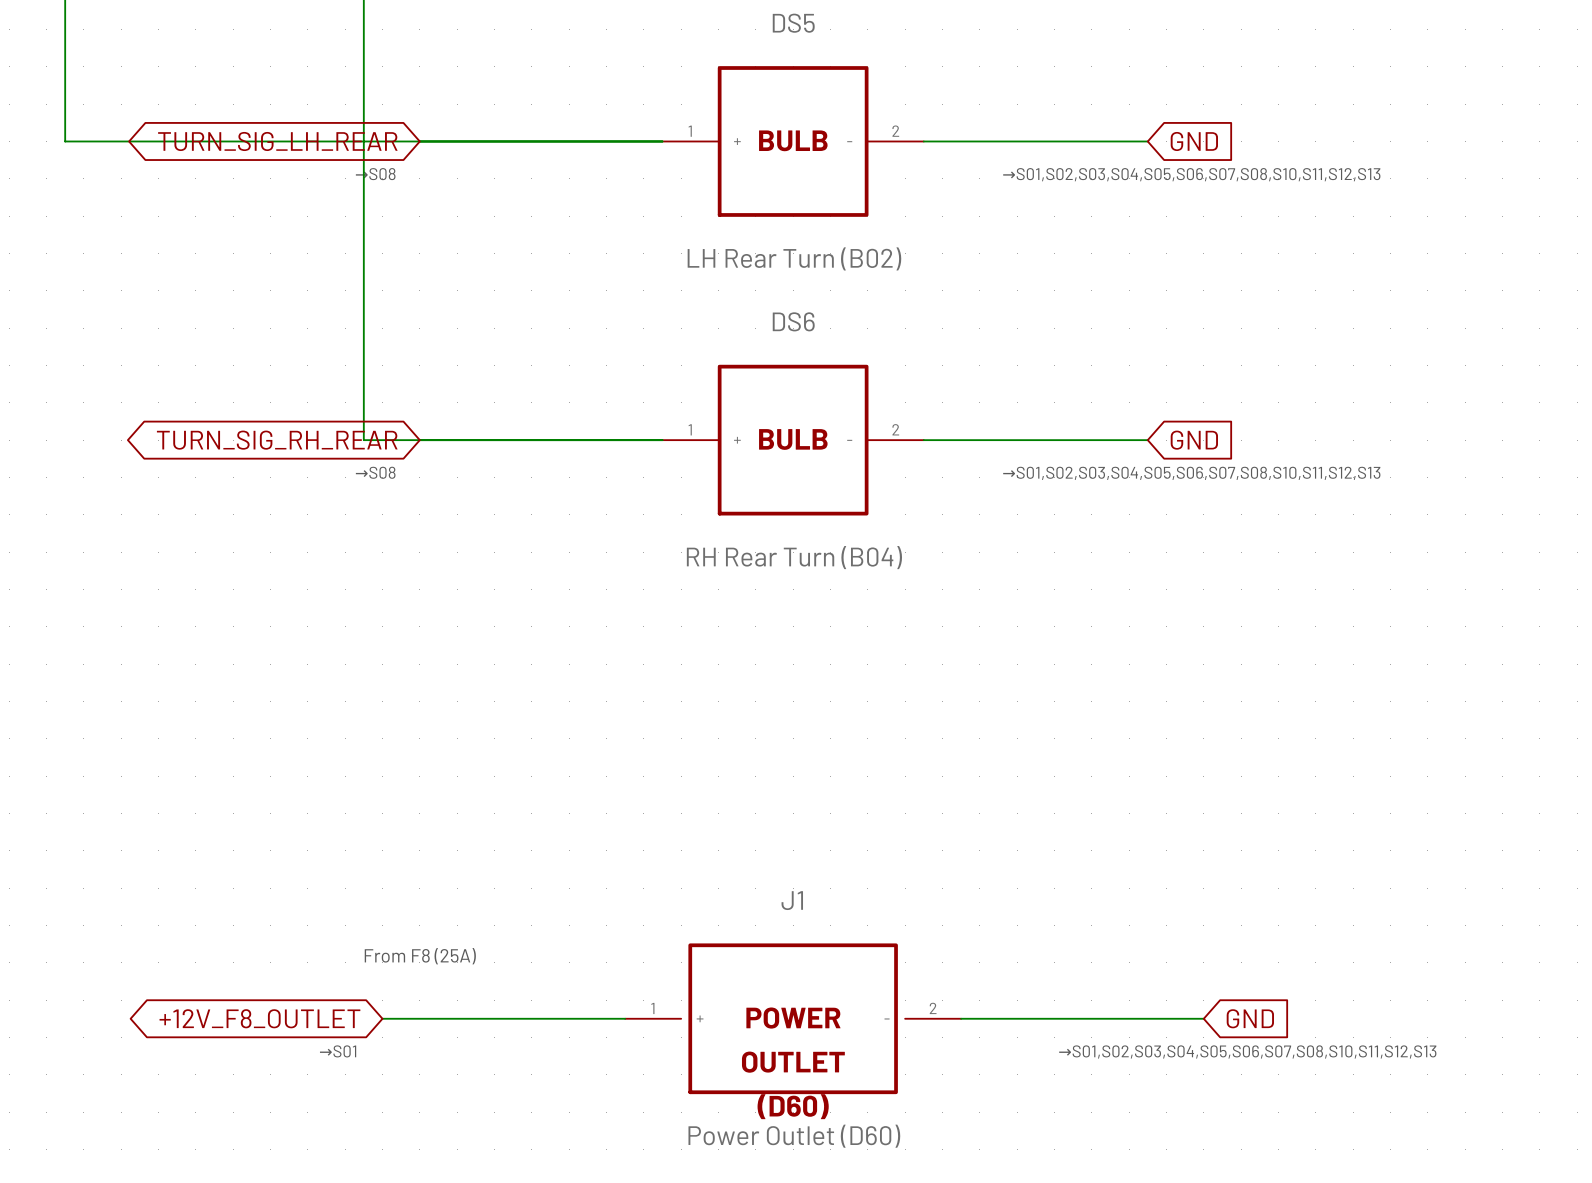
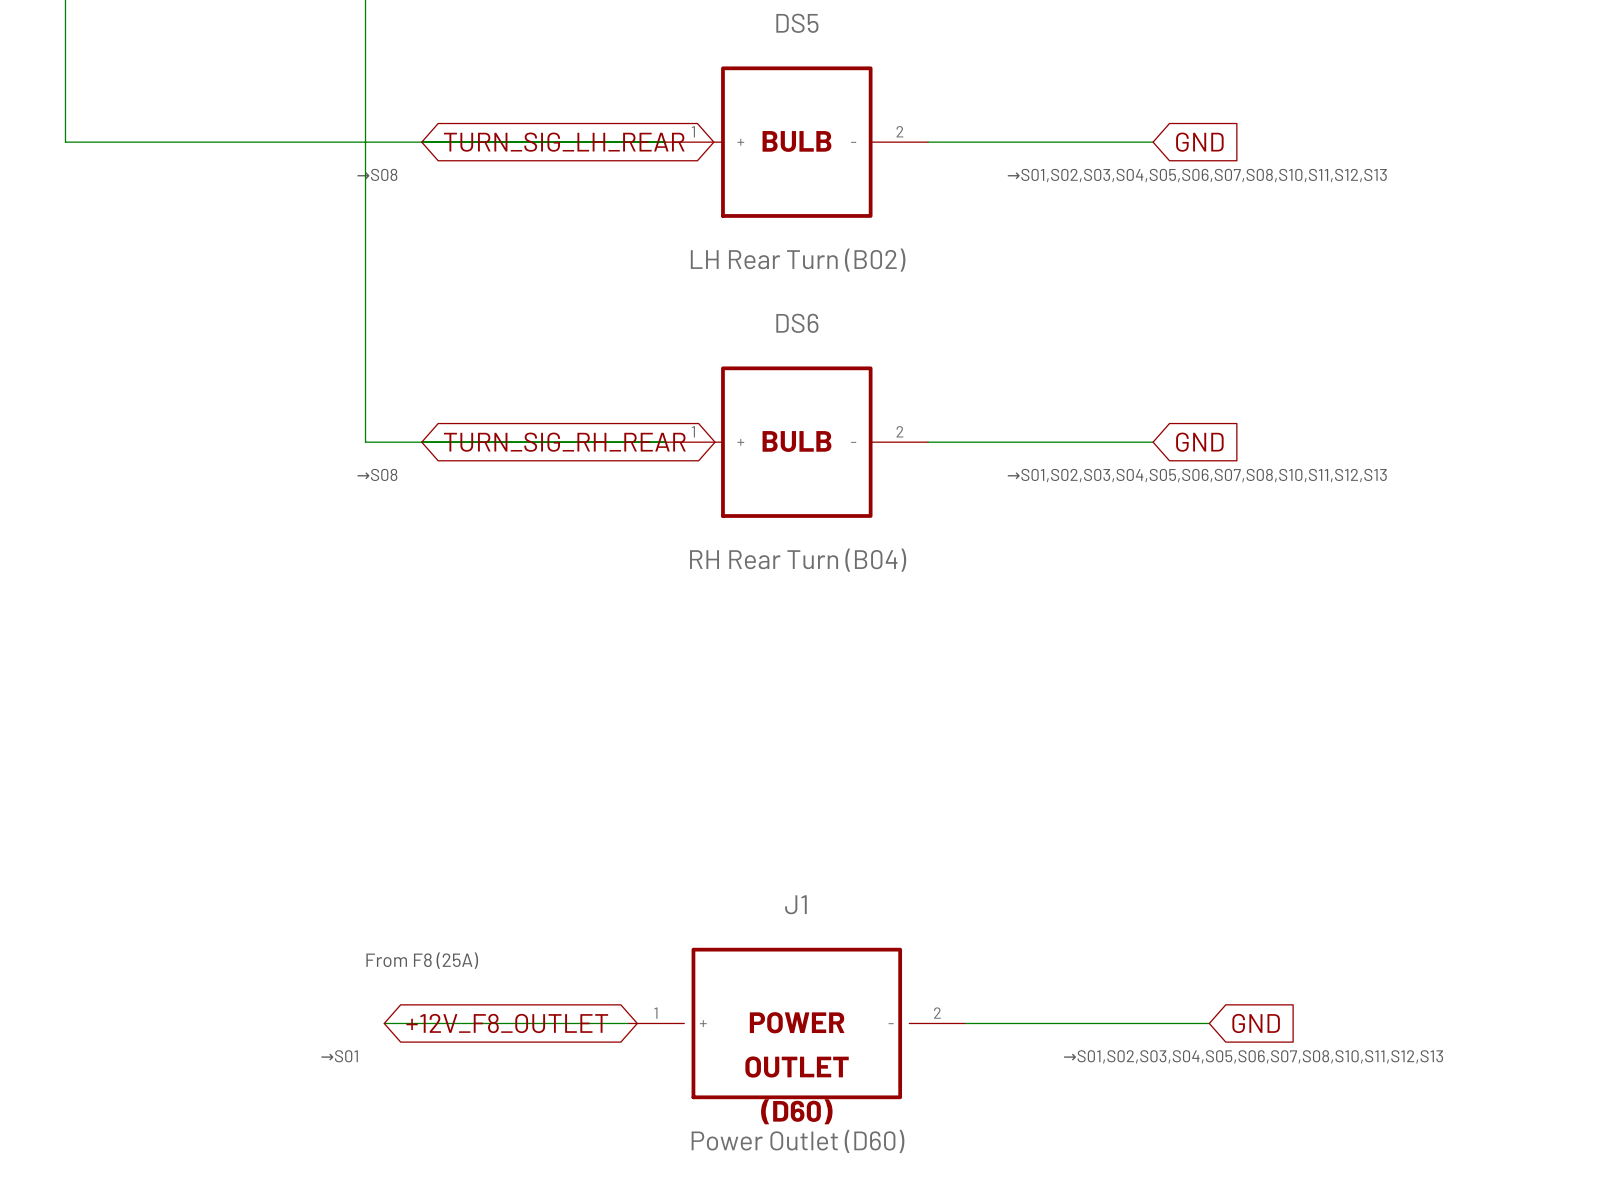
global label rotation: 0° (277, 141) -> 180° (564, 142)
global label rotation: 0° (277, 440) -> 180° (564, 442)
global label rotation: 0° (259, 1018) -> 180° (507, 1023)

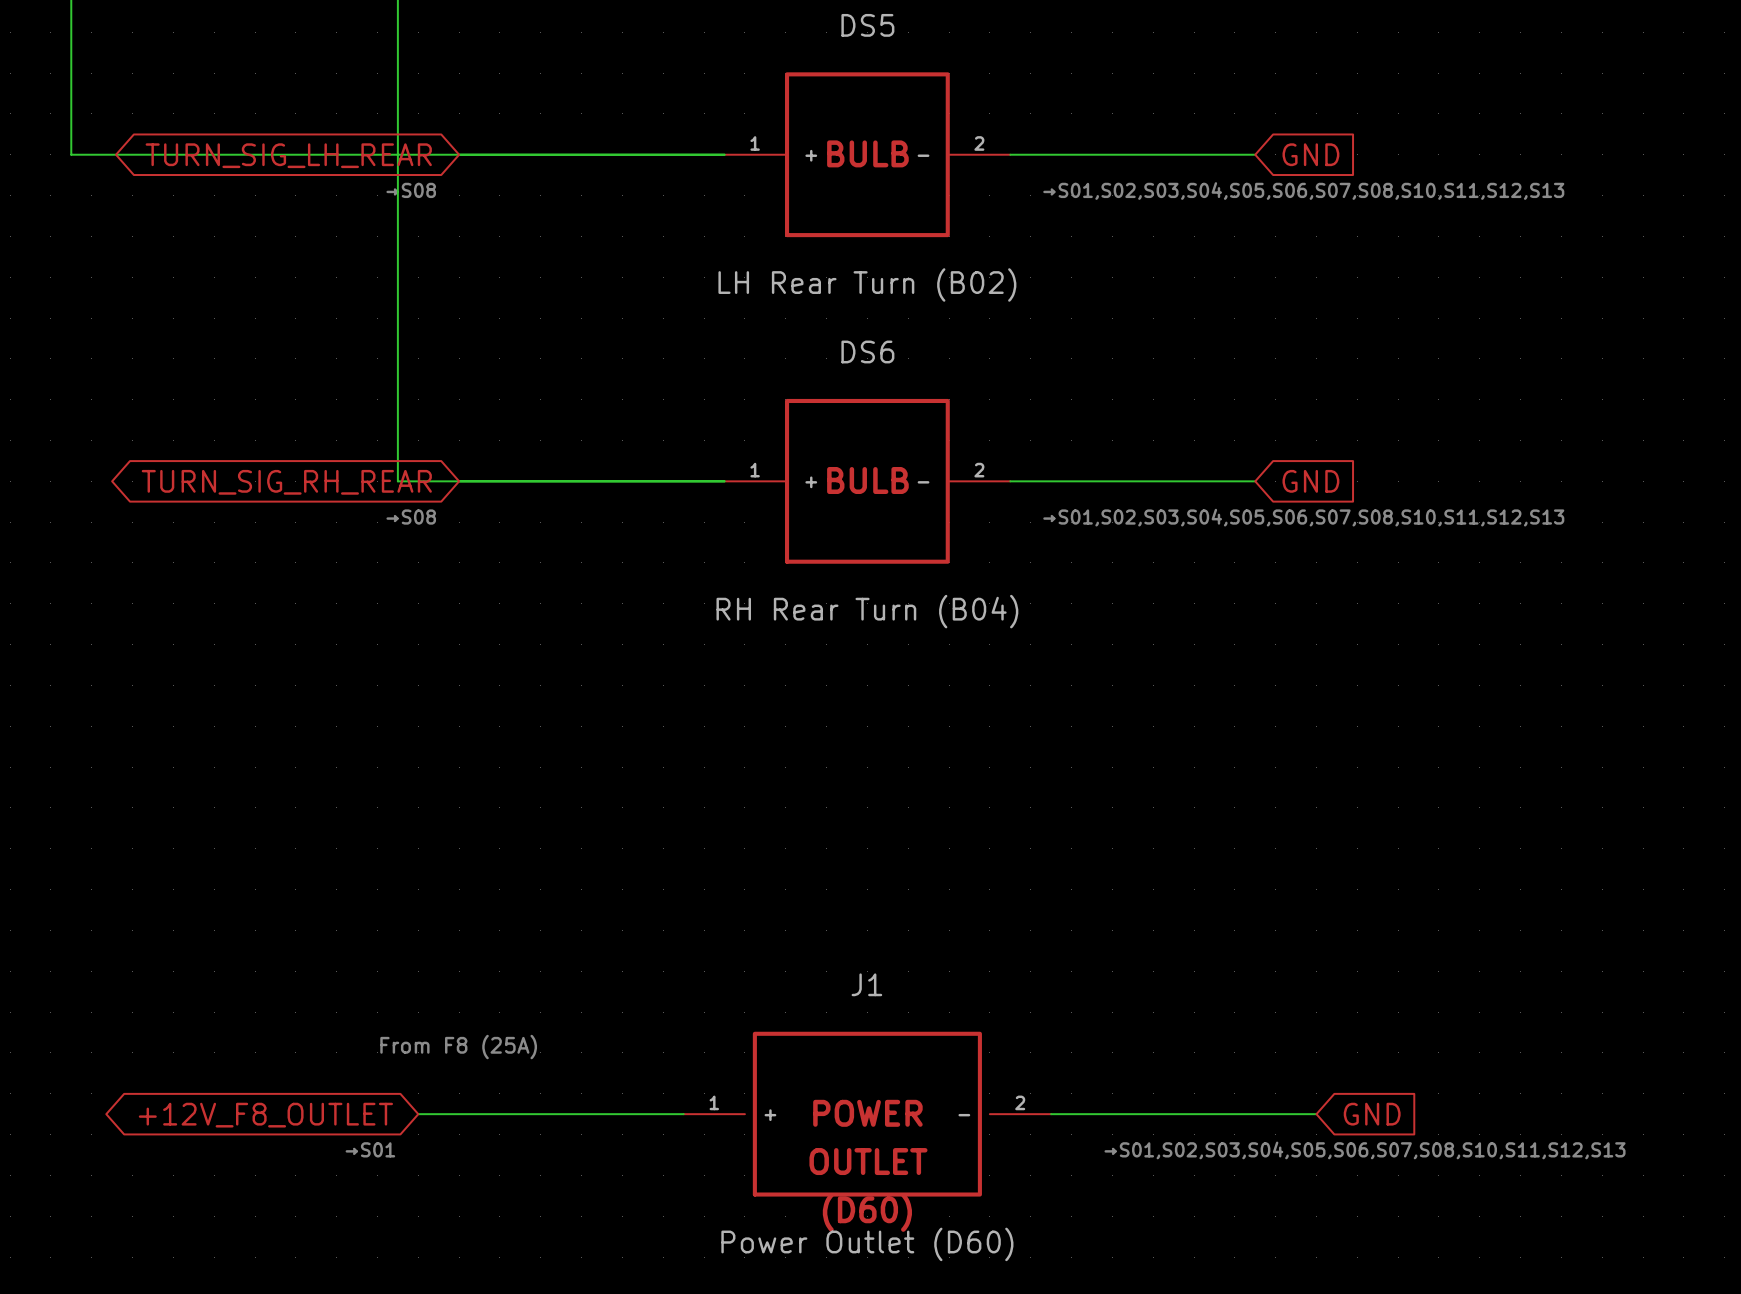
global label rotation: 0° (564, 142) -> 180° (288, 155)
global label rotation: 0° (564, 442) -> 180° (286, 482)
global label rotation: 0° (507, 1023) -> 180° (265, 1115)

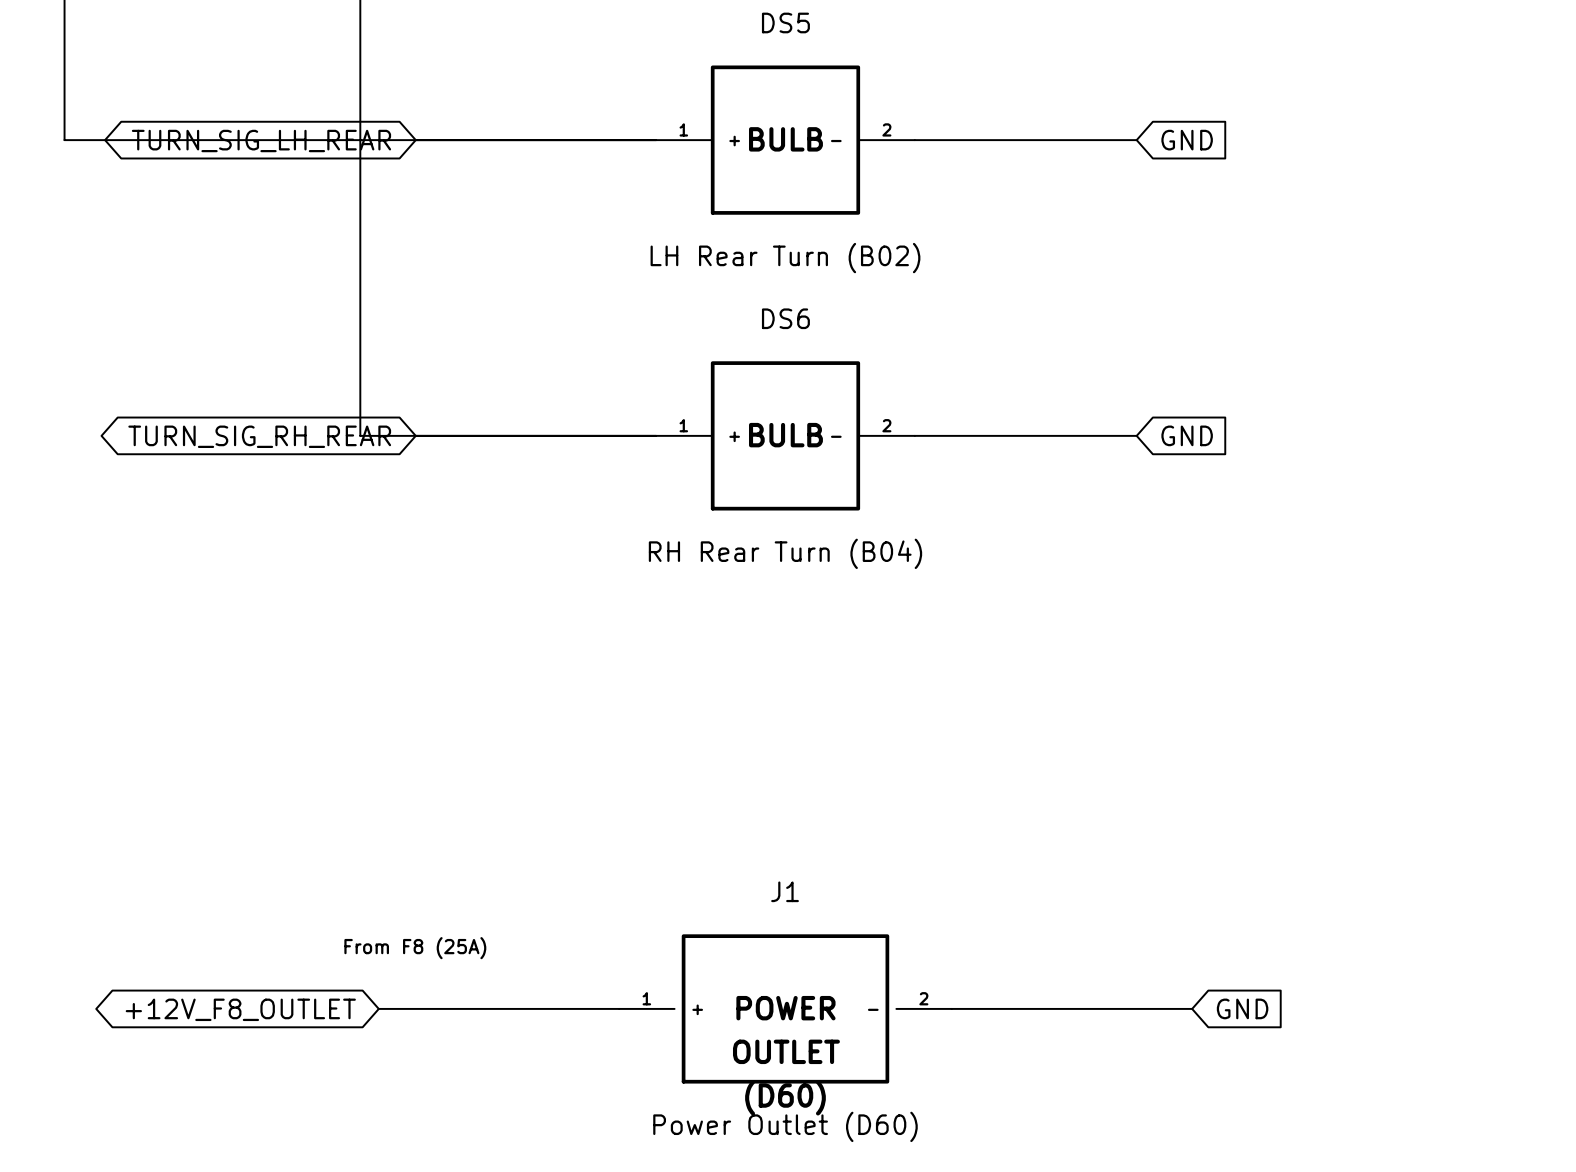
text: →S08 (411, 190) -> none
text: →S01,S02,S03,S04,S05,S06,S07,S08,S10,S11,S12,S13 (1303, 191) -> none
text: →S08 (411, 517) -> none
text: →S01,S02,S03,S04,S05,S06,S07,S08,S10,S11,S12,S13 (1303, 517) -> none
text: →S01 (370, 1149) -> none
text: →S01,S02,S03,S04,S05,S06,S07,S08,S10,S11,S12,S13 (1365, 1150) -> none

